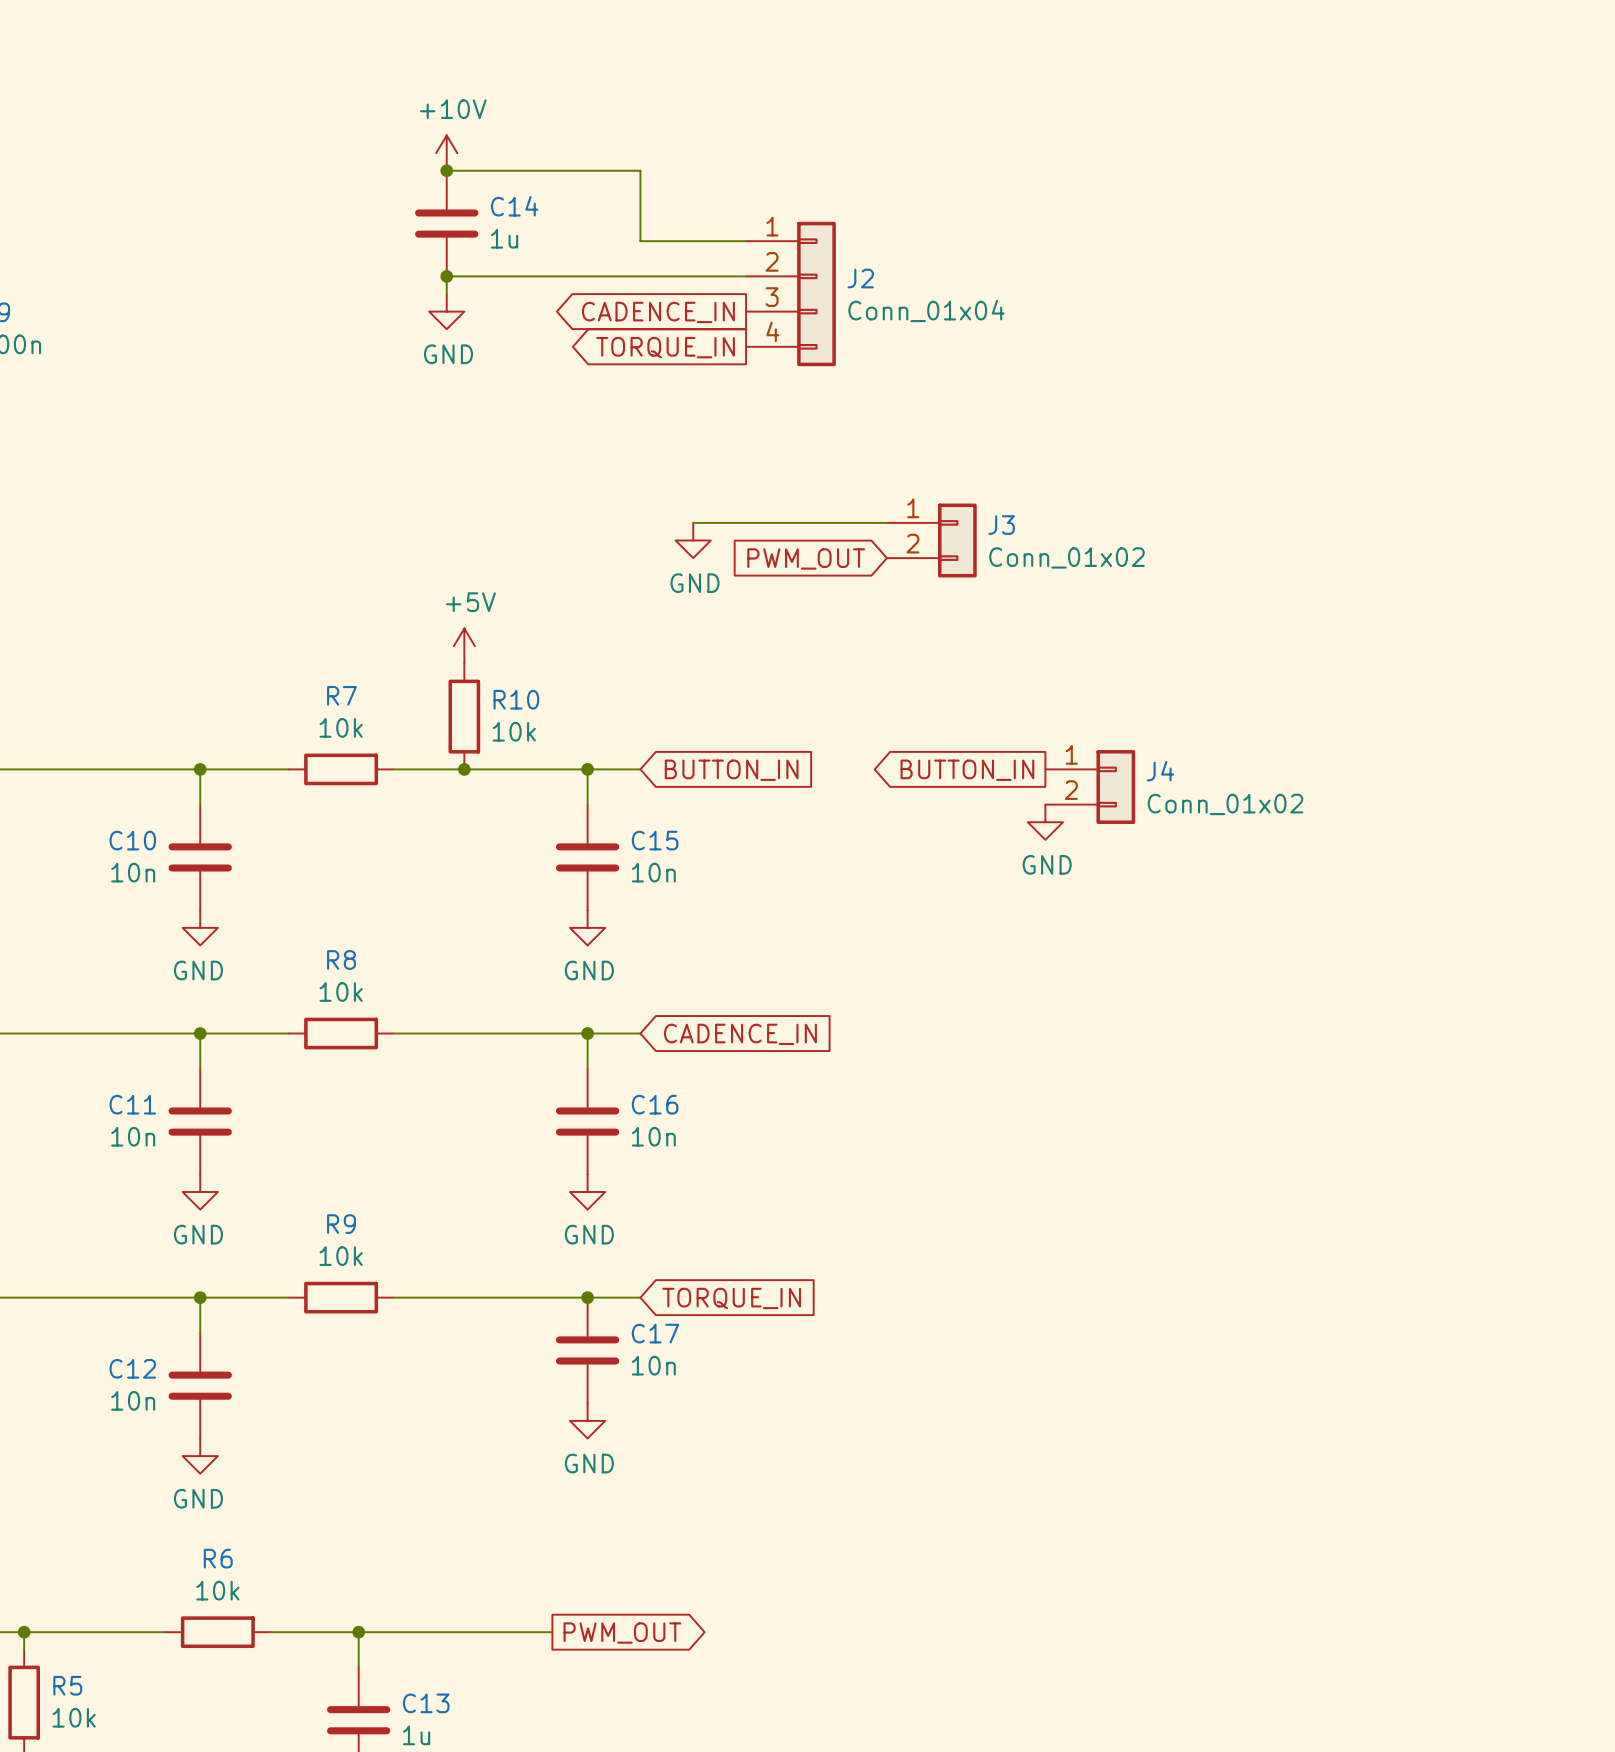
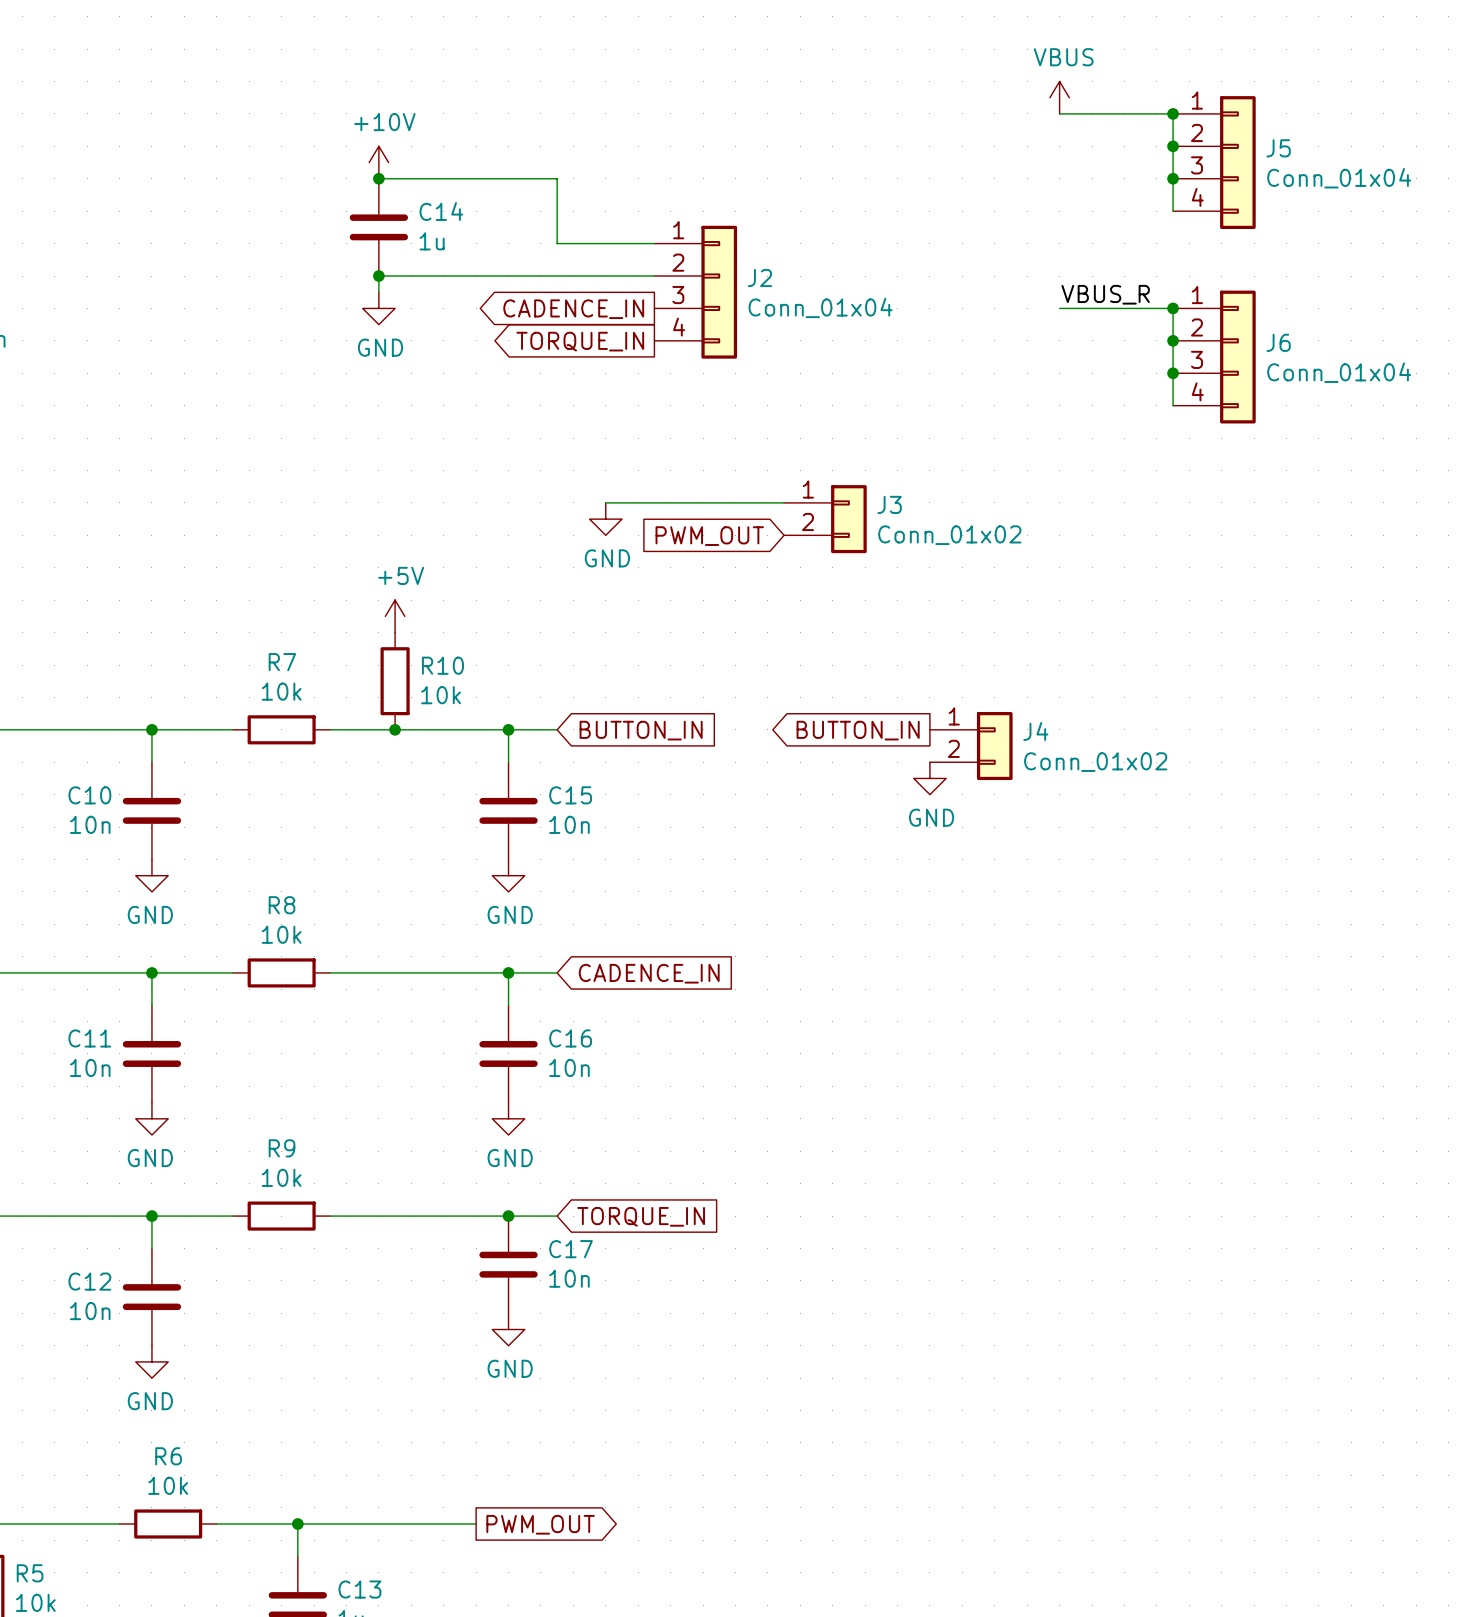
power symbol: none -> VBUS (1059, 97)
wire: none -> (1059, 113) (1173, 113) (1173, 211)
junction: none -> (1173, 113)
junction: none -> (1173, 146)
J5: none -> Conn_01x04 (1214, 162)
junction: none -> (1173, 178)
label: none -> VBUS_R (1105, 294)
wire: none -> (1059, 308) (1173, 308) (1173, 405)
junction: none -> (1173, 308)
junction: none -> (1173, 340)
J6: none -> Conn_01x04 (1214, 357)
junction: none -> (1173, 373)

